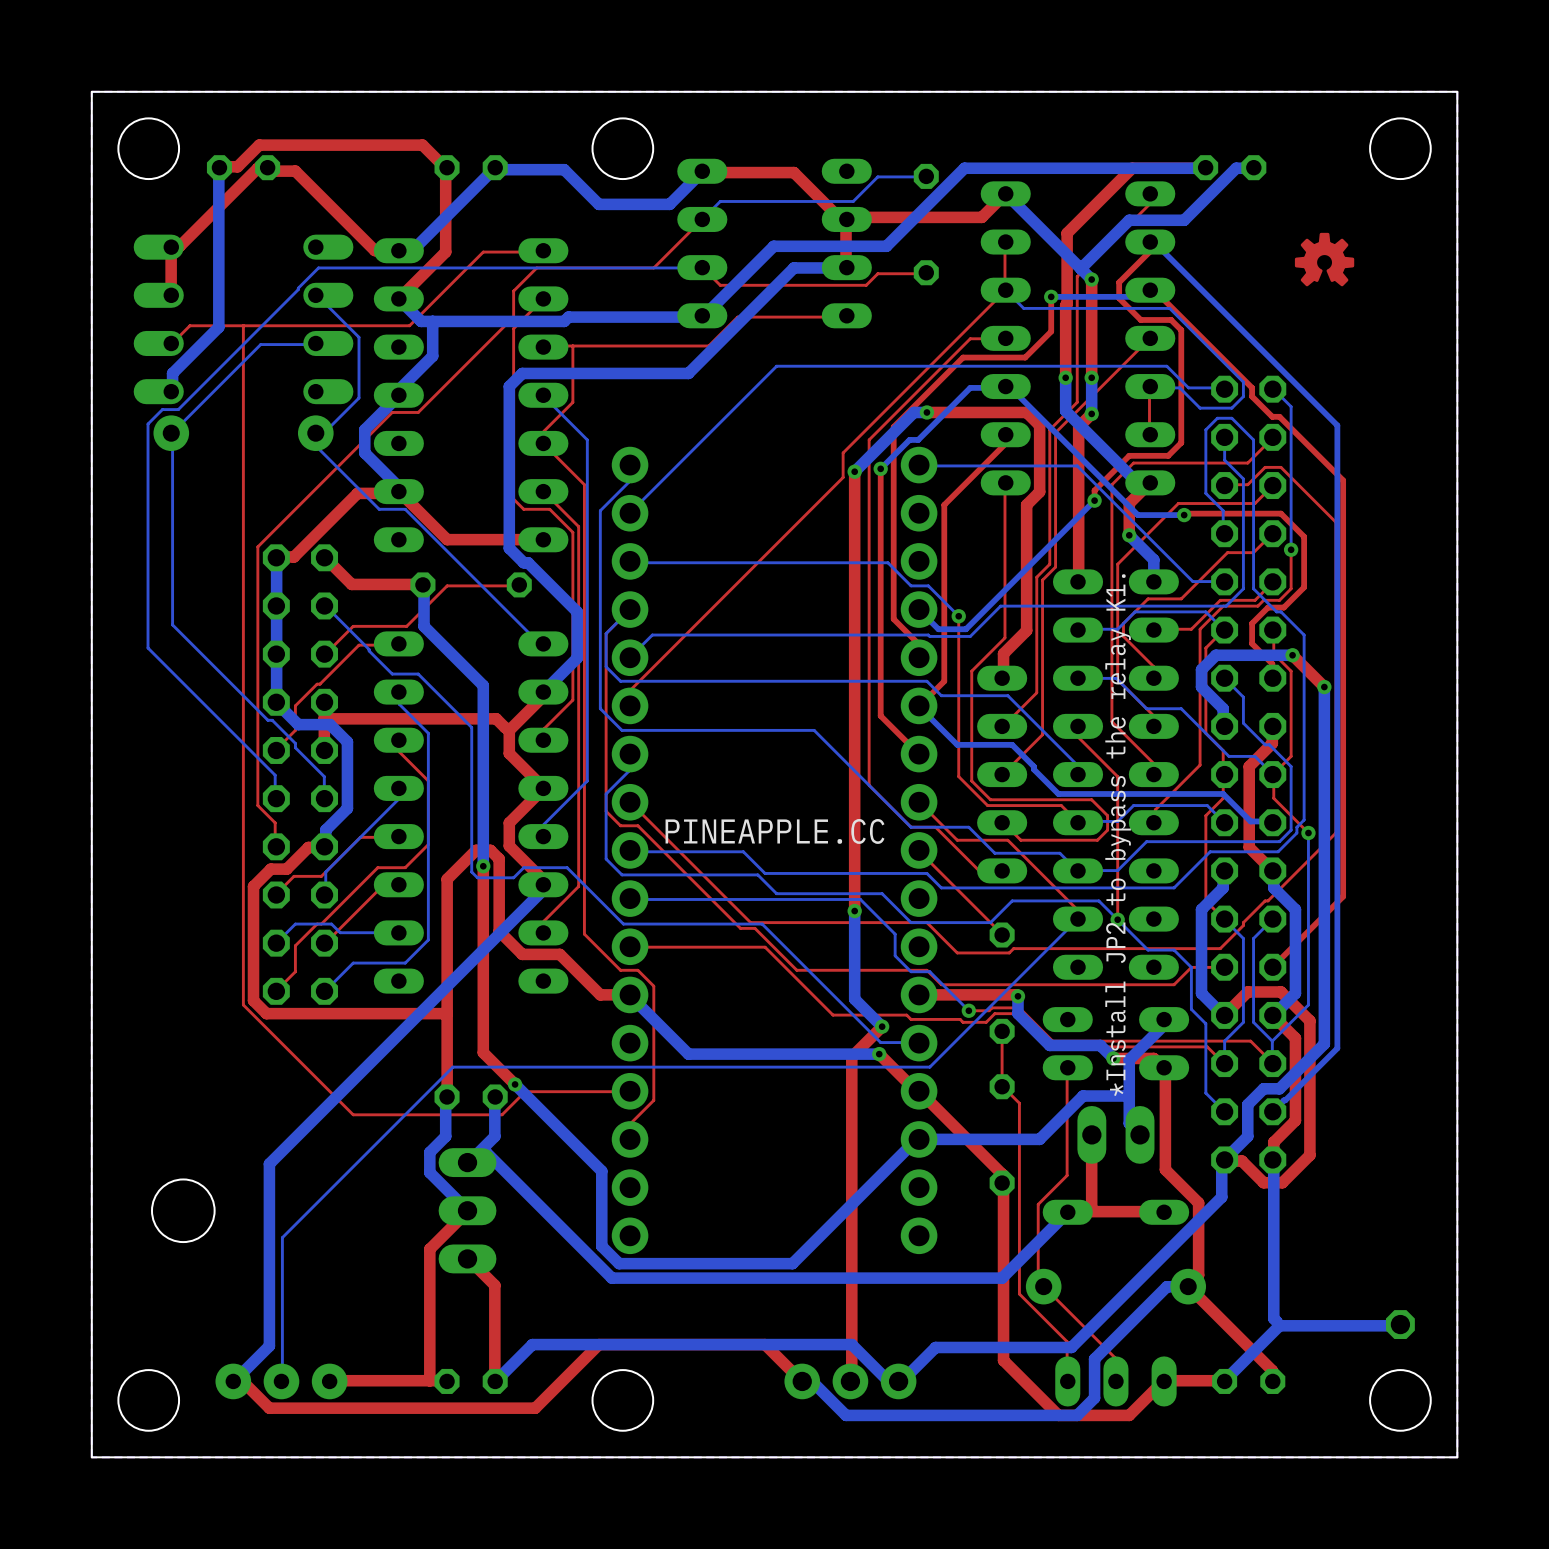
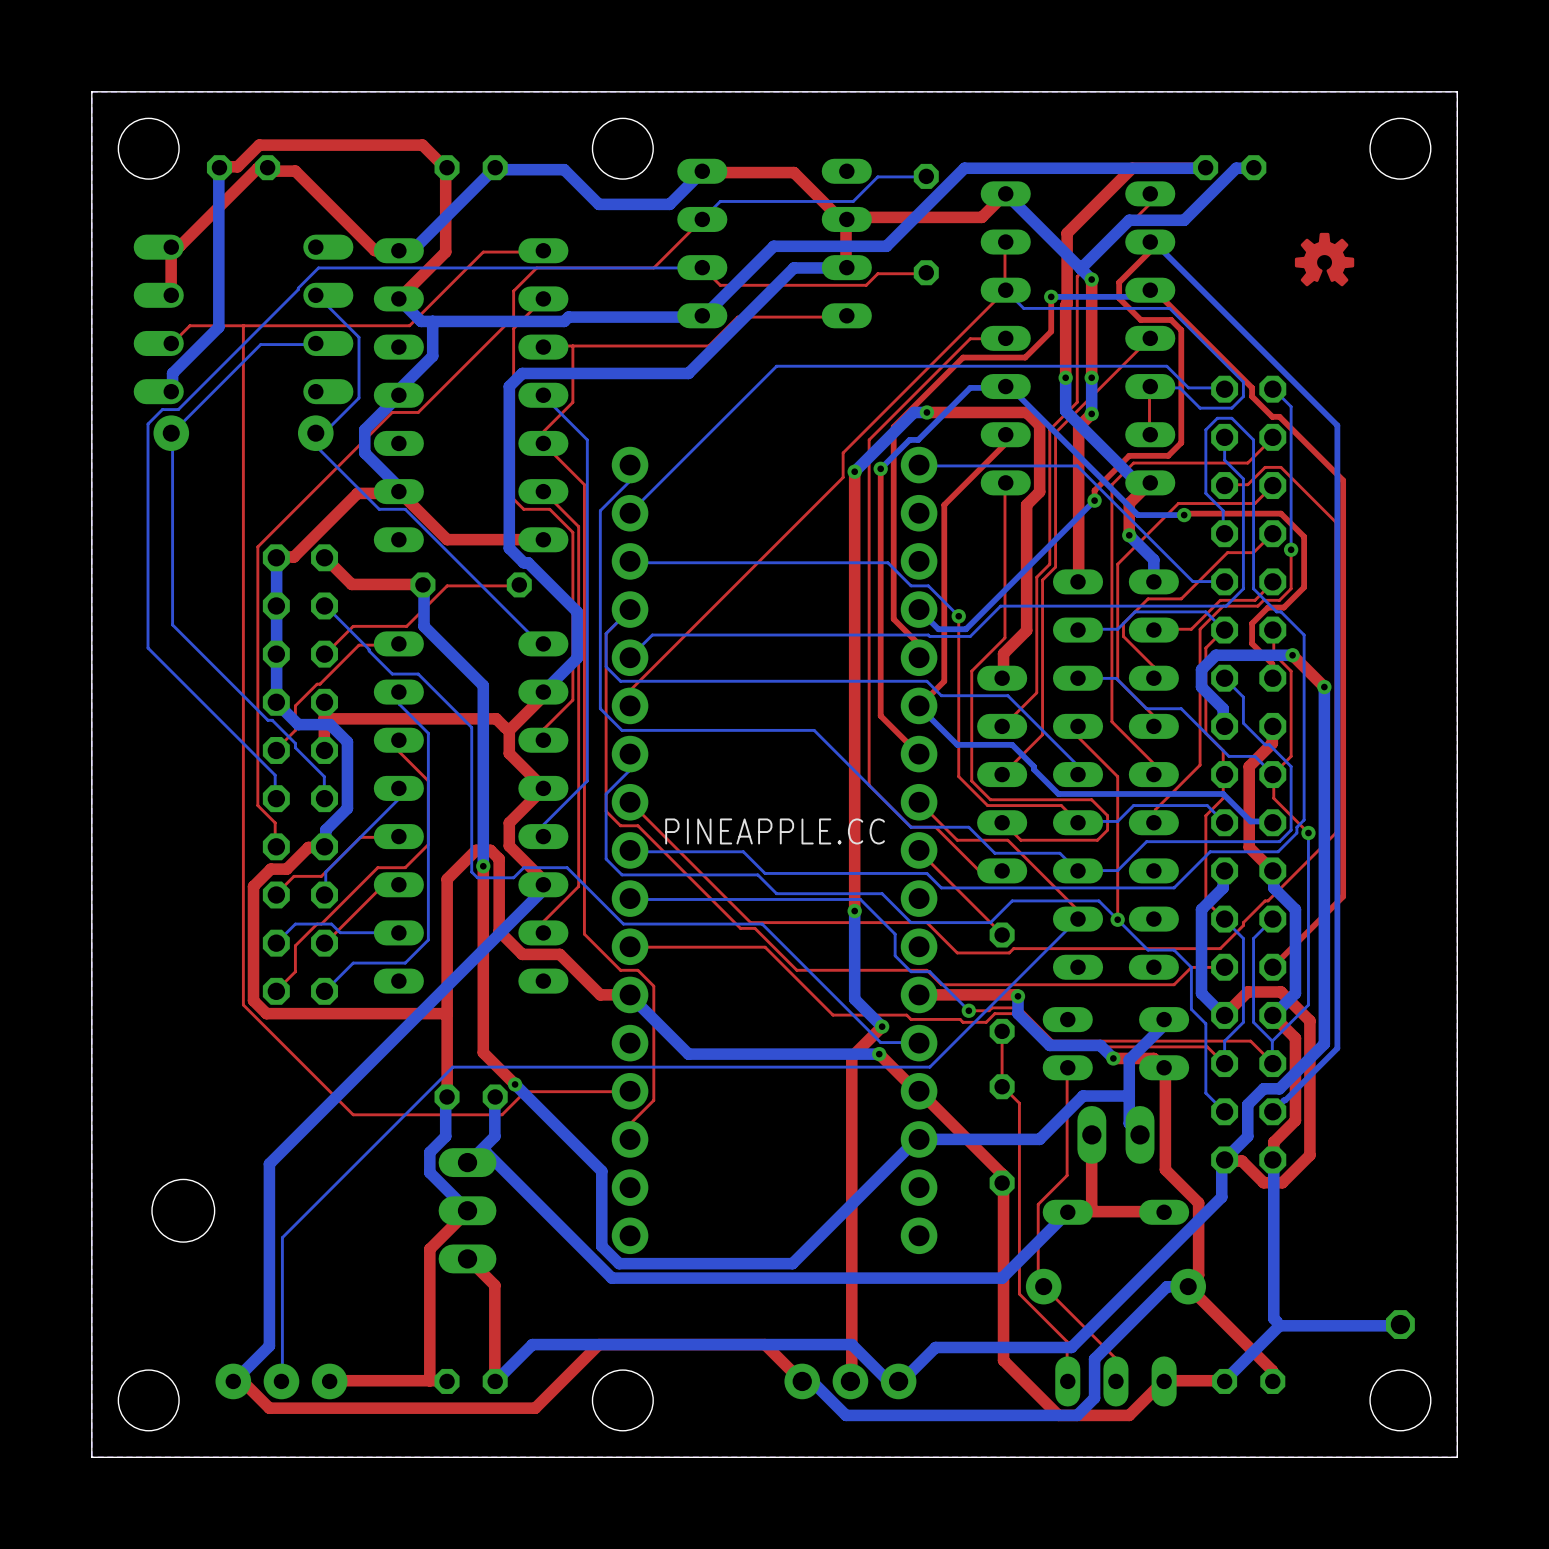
text: *Install JP2 to bypass the relay K1. (1118, 835) -> none

